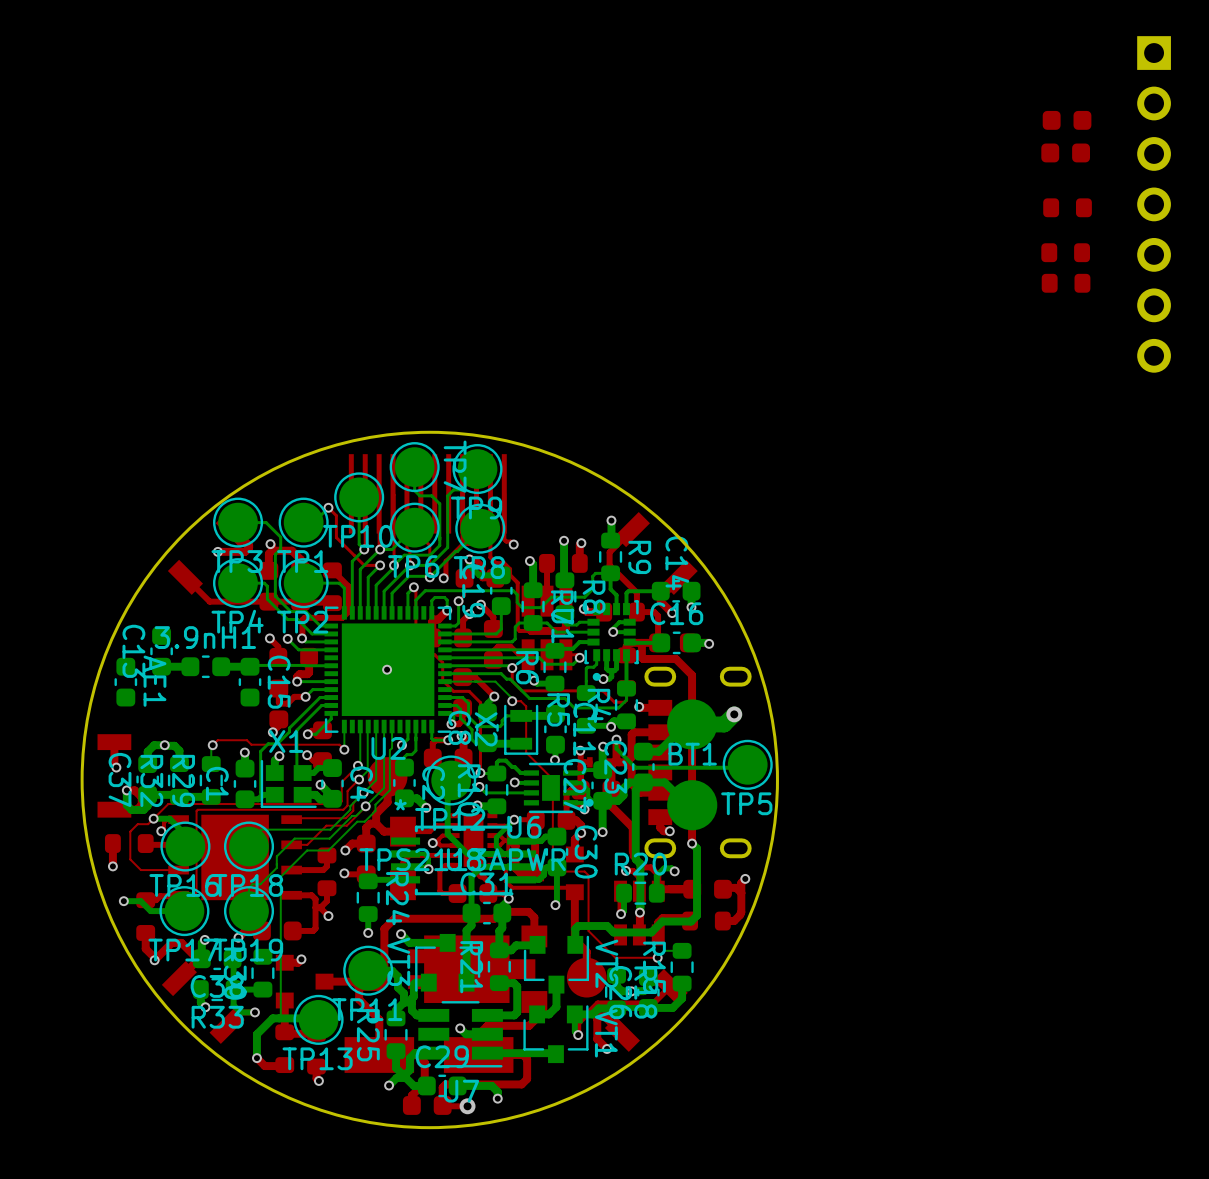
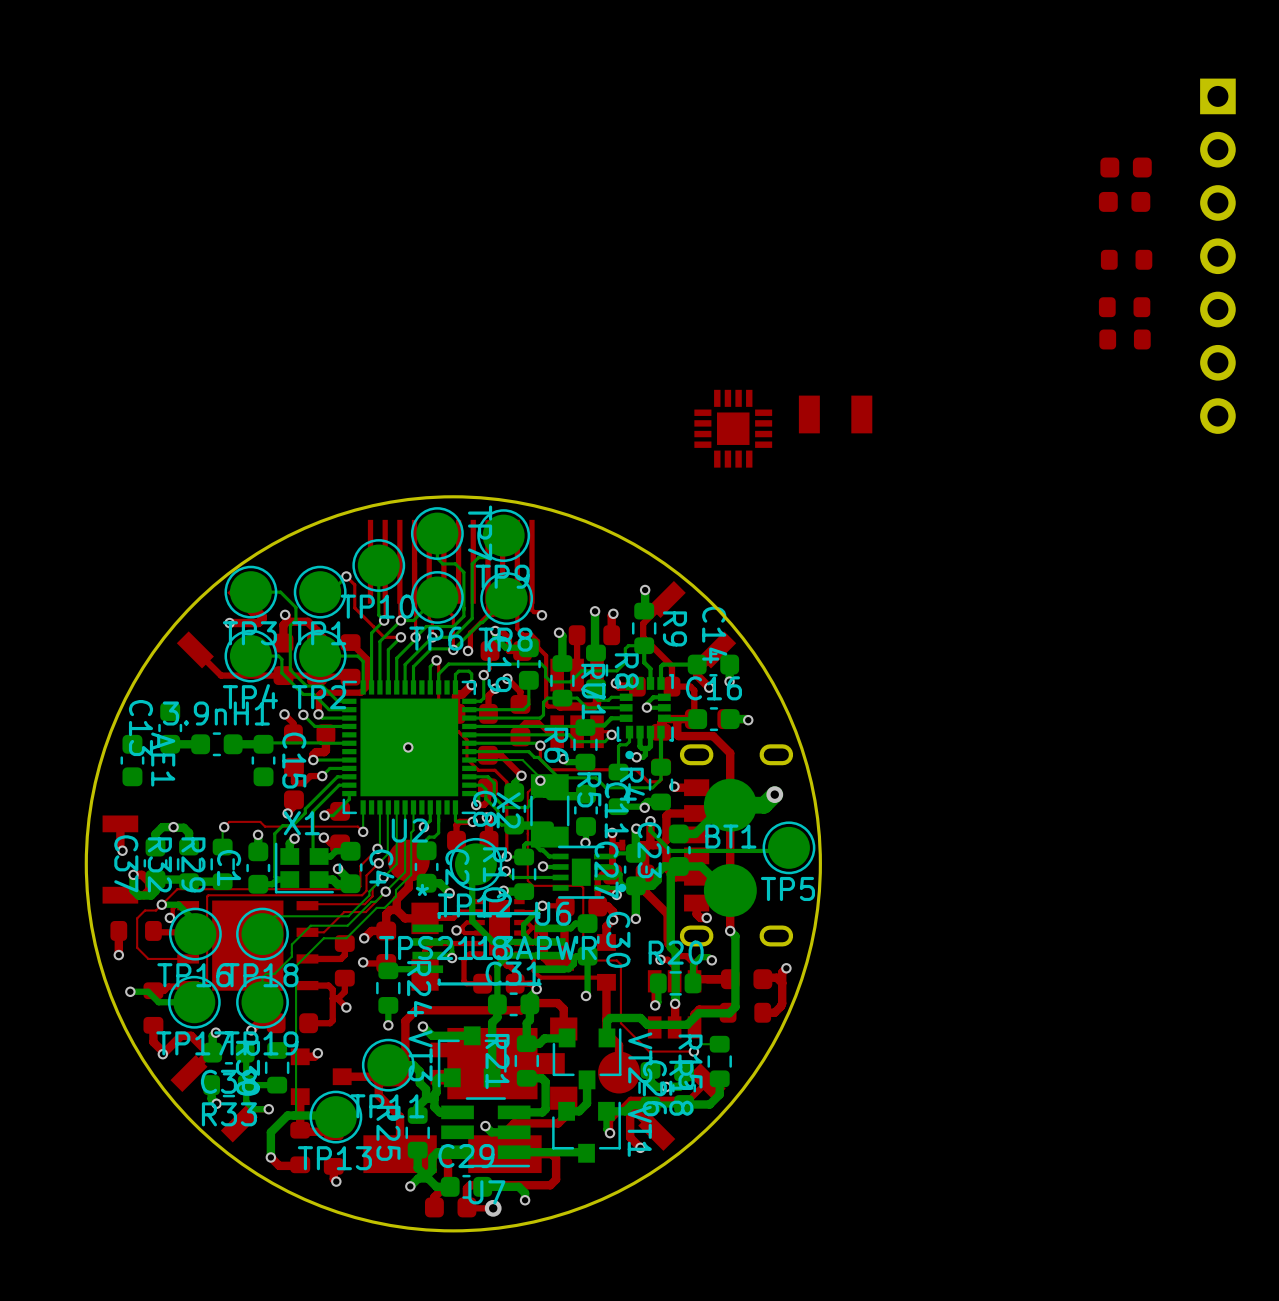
part: none -> (835, 414)
part: none -> (733, 428)
top track: (512, 701) (520, 701) (526, 706) (526, 752) (552, 779) (552, 802) -> (540, 780) (527, 792) (527, 880) (533, 885) (581, 885) (583, 887)
X2 footprint: [504, 704, 539, 755] -> [530, 774, 570, 848]

